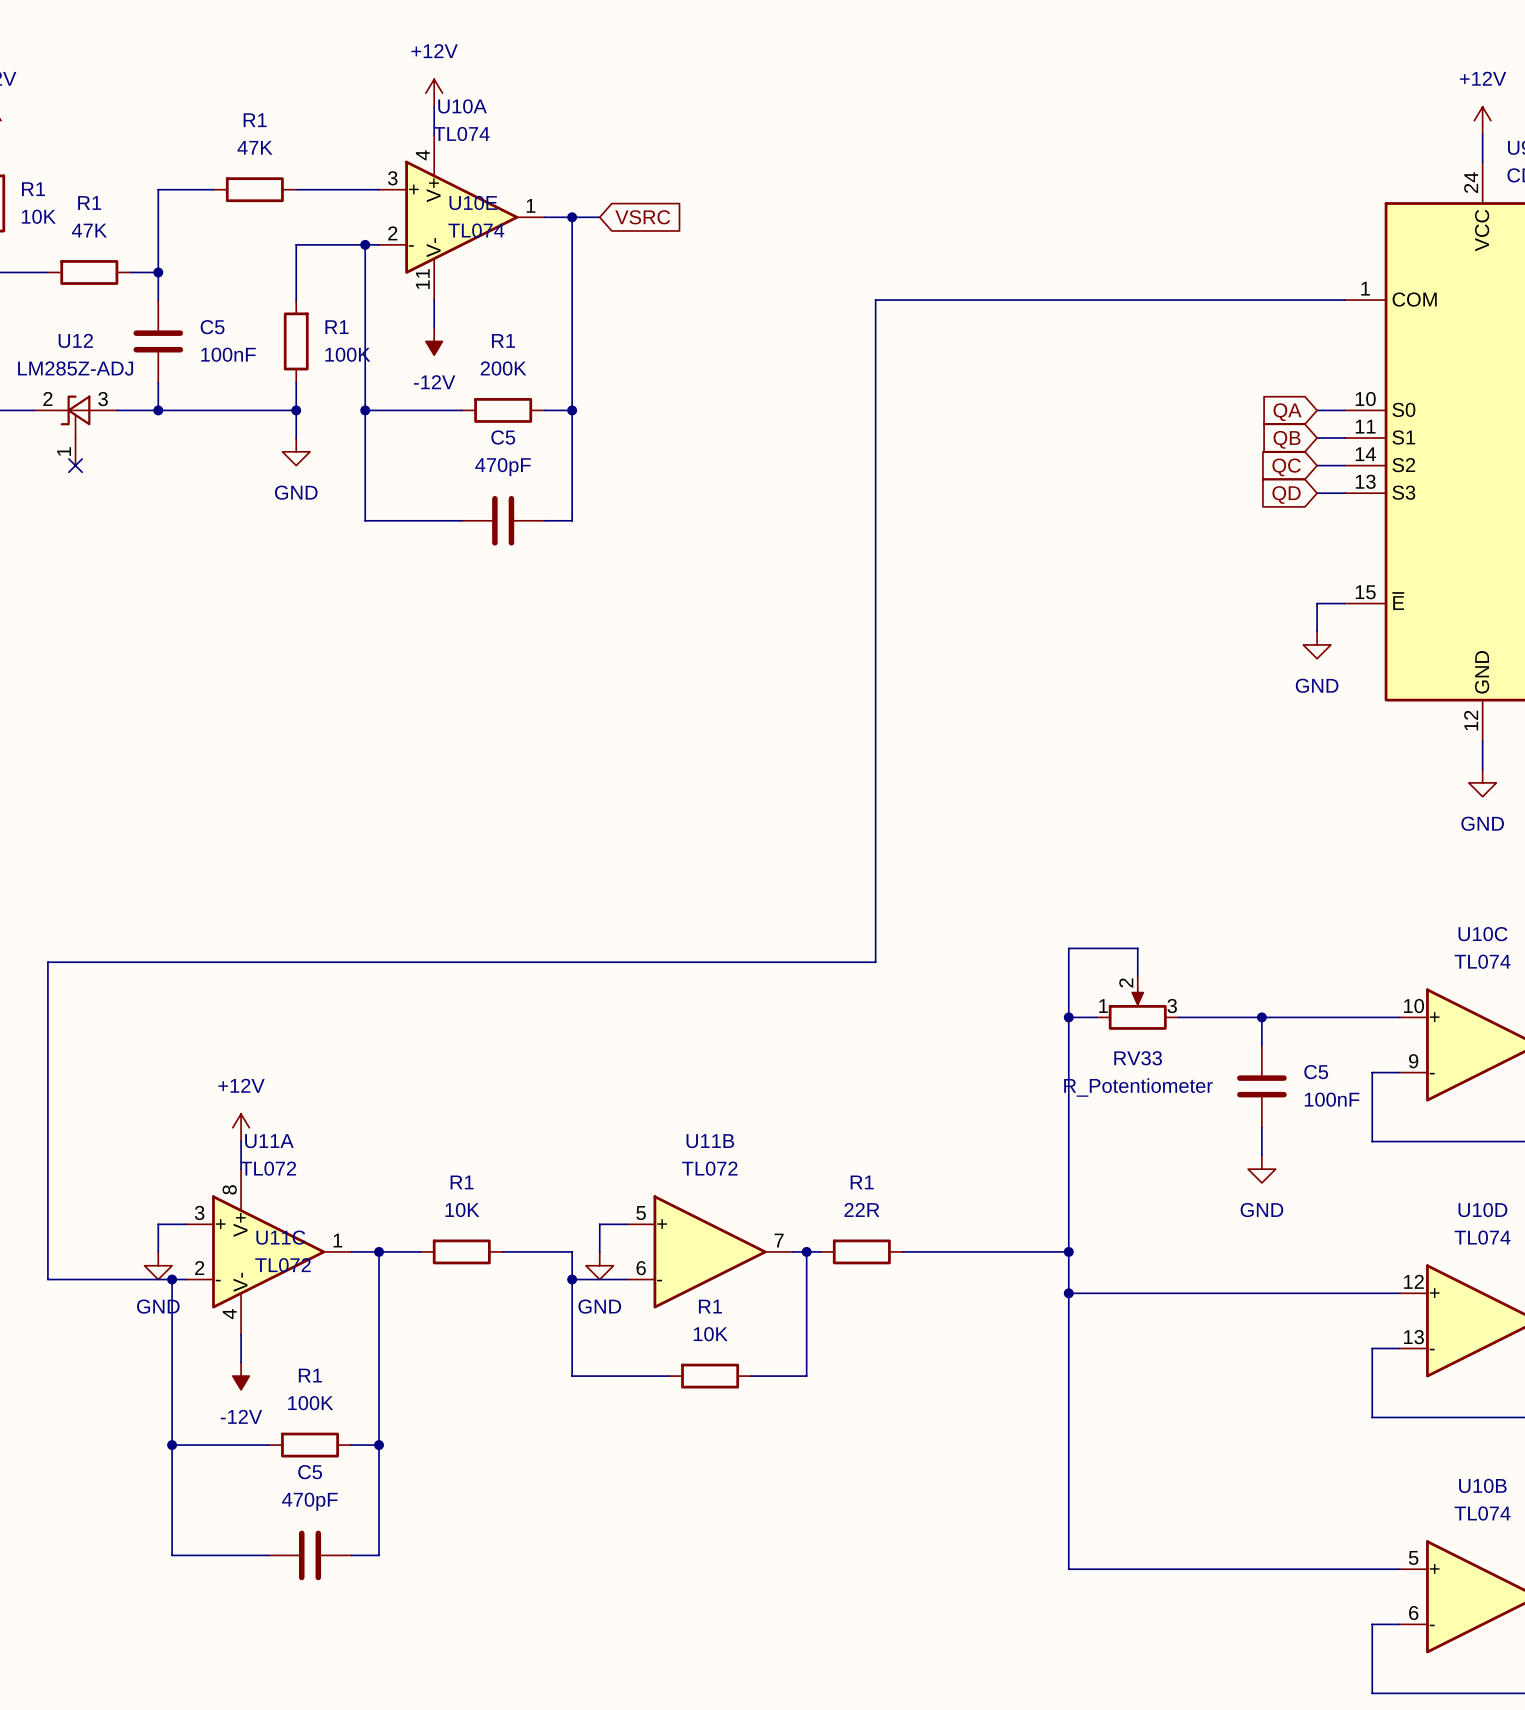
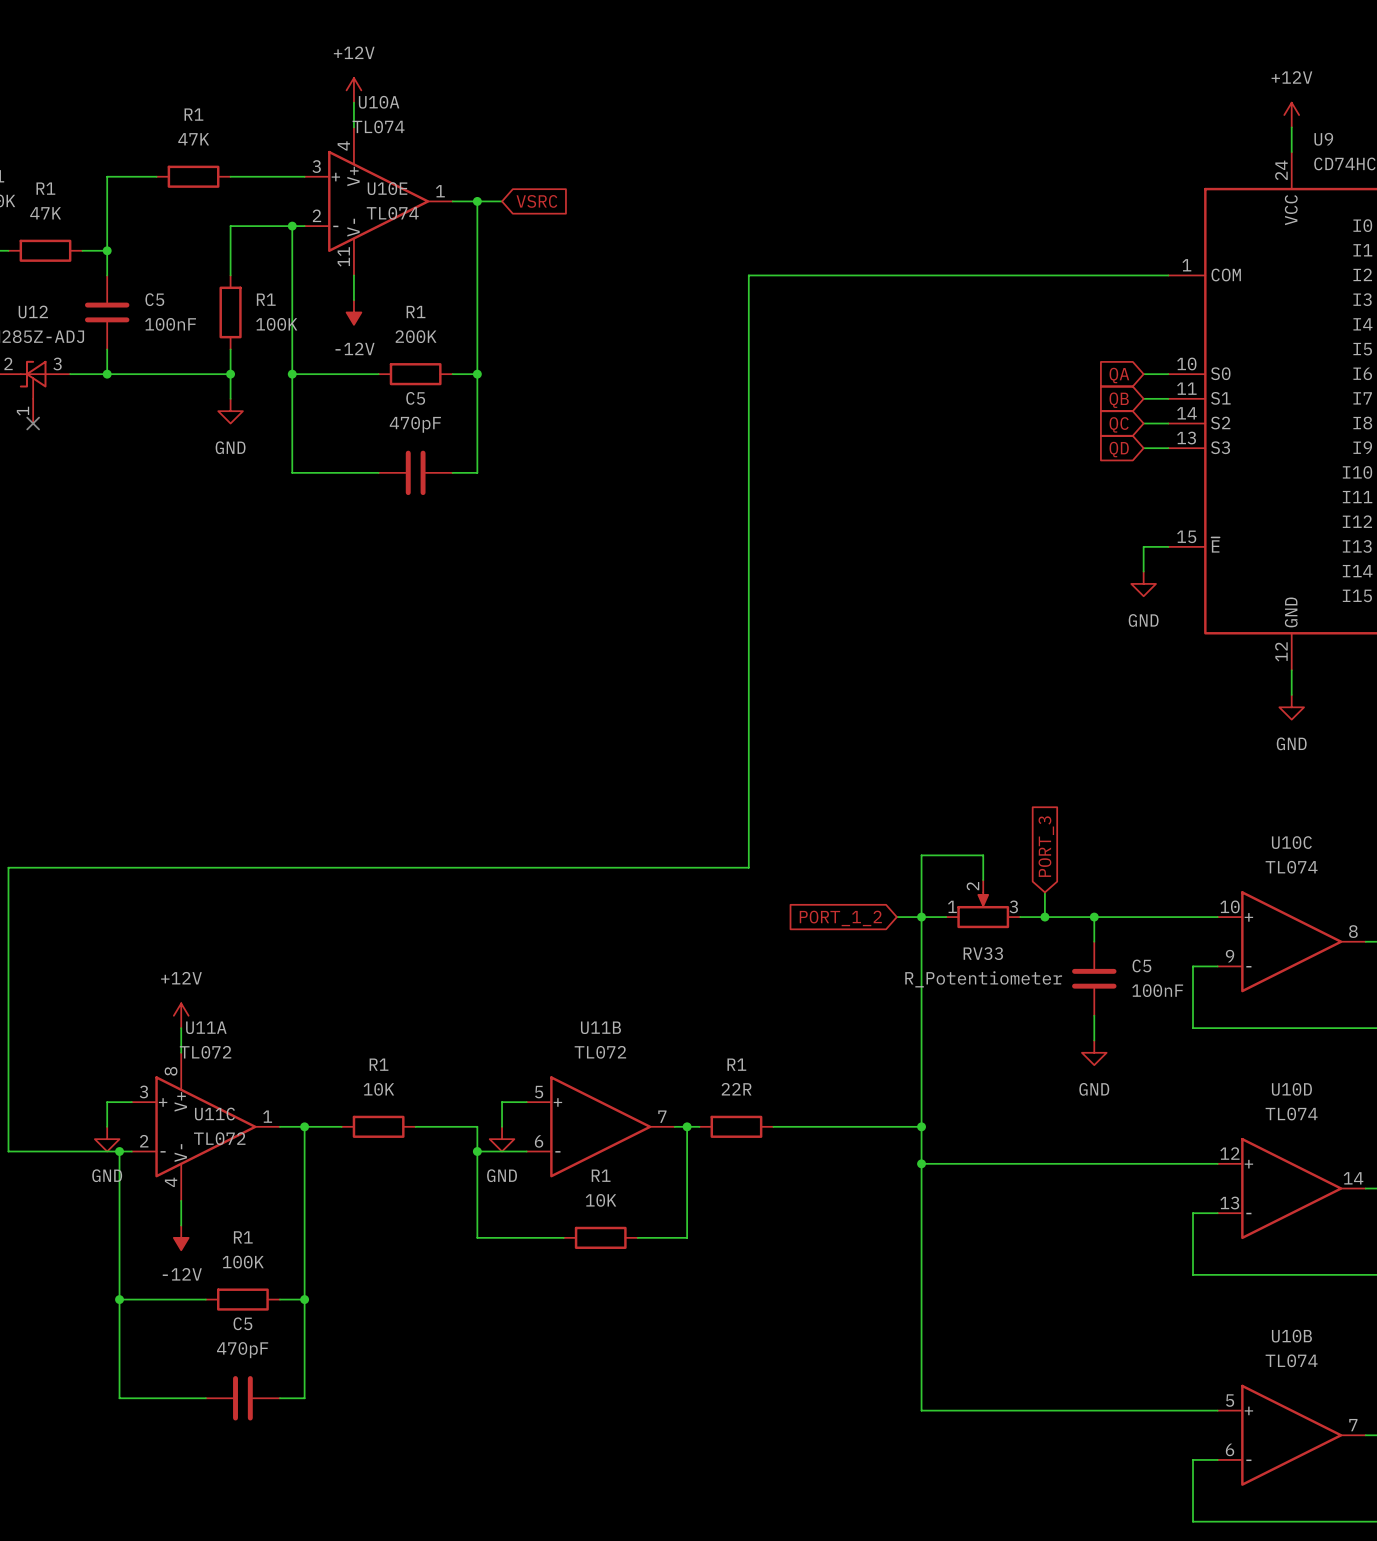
global label: none -> PORT_3 (1046, 846)
wire: none -> (1044, 892) (1044, 917)
wire: none -> (896, 917) (921, 917)
junction: none -> (1044, 917)
global label: none -> PORT_1_2 (840, 918)

